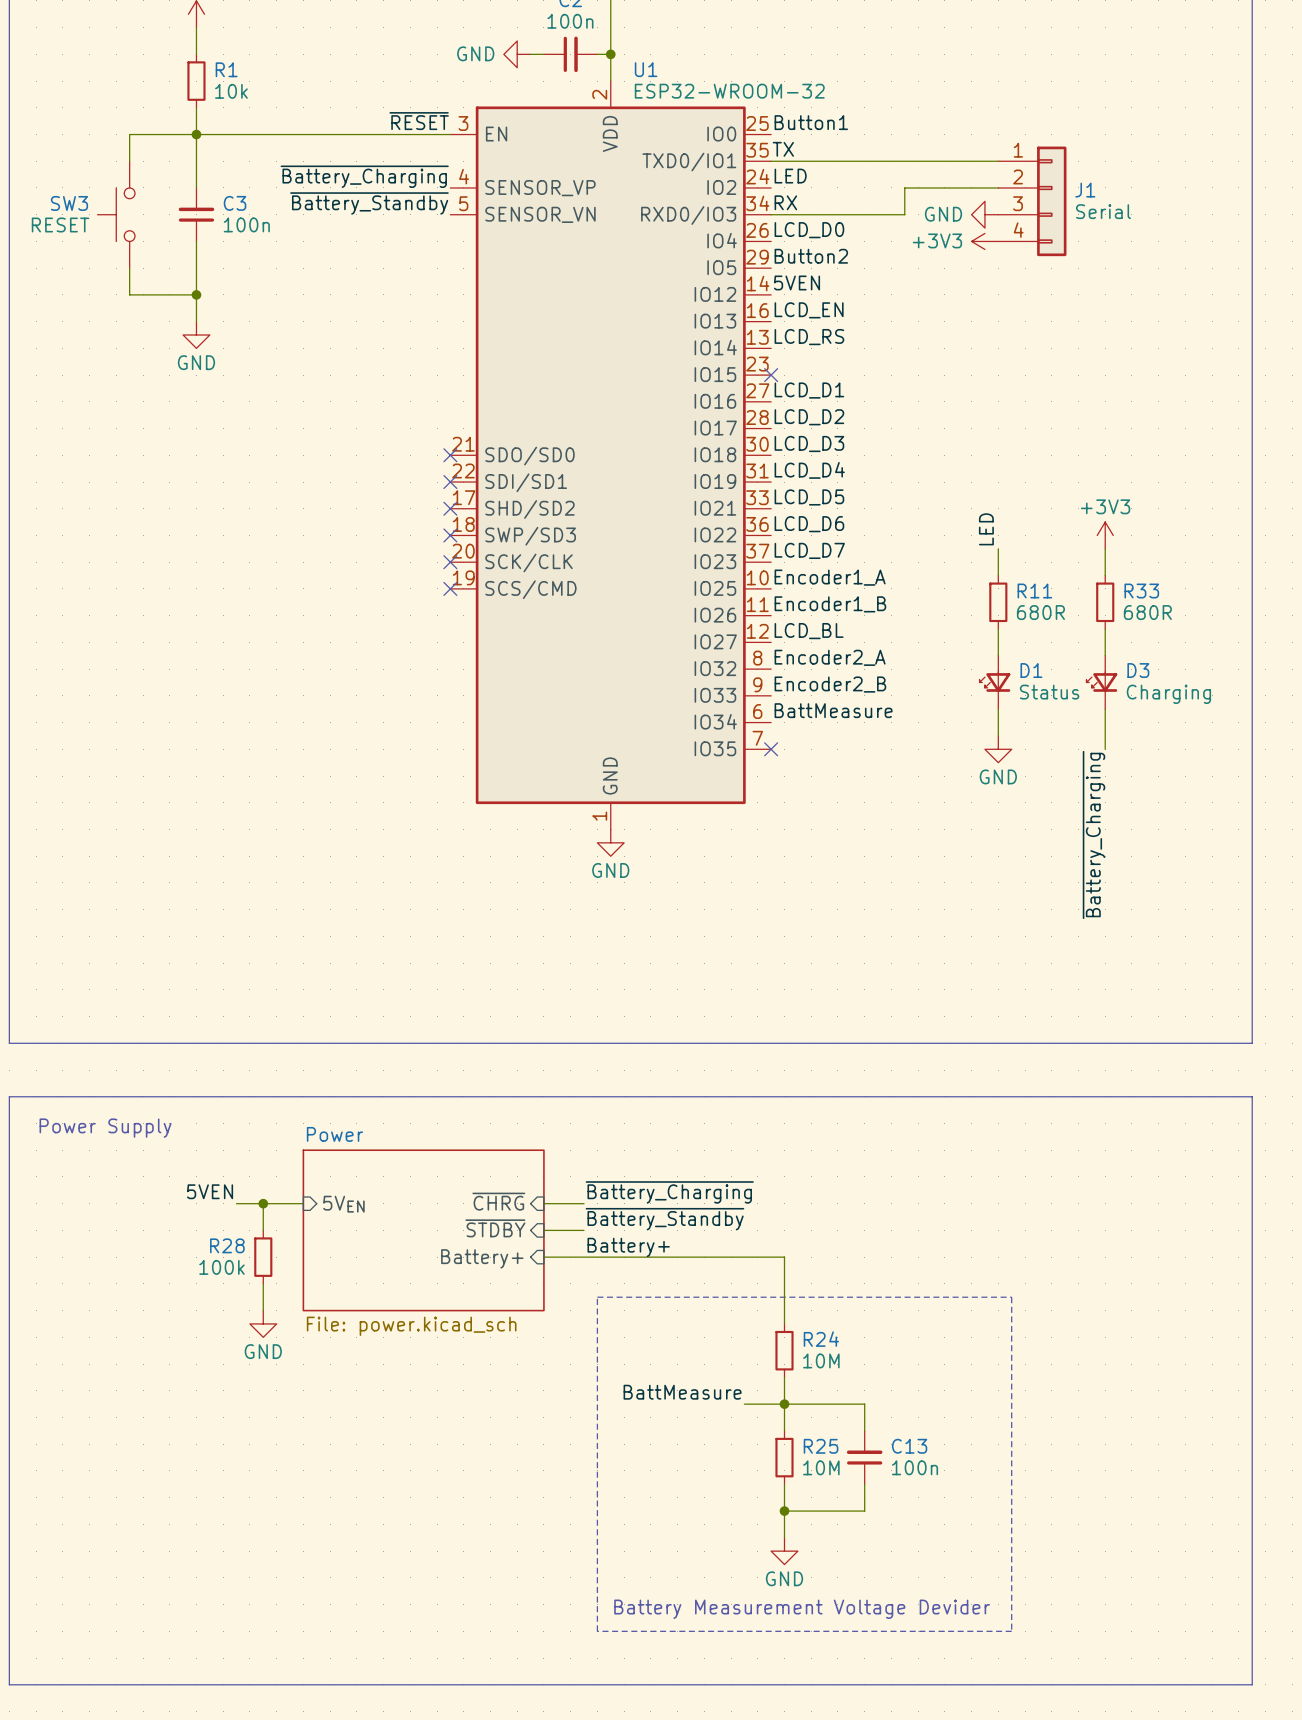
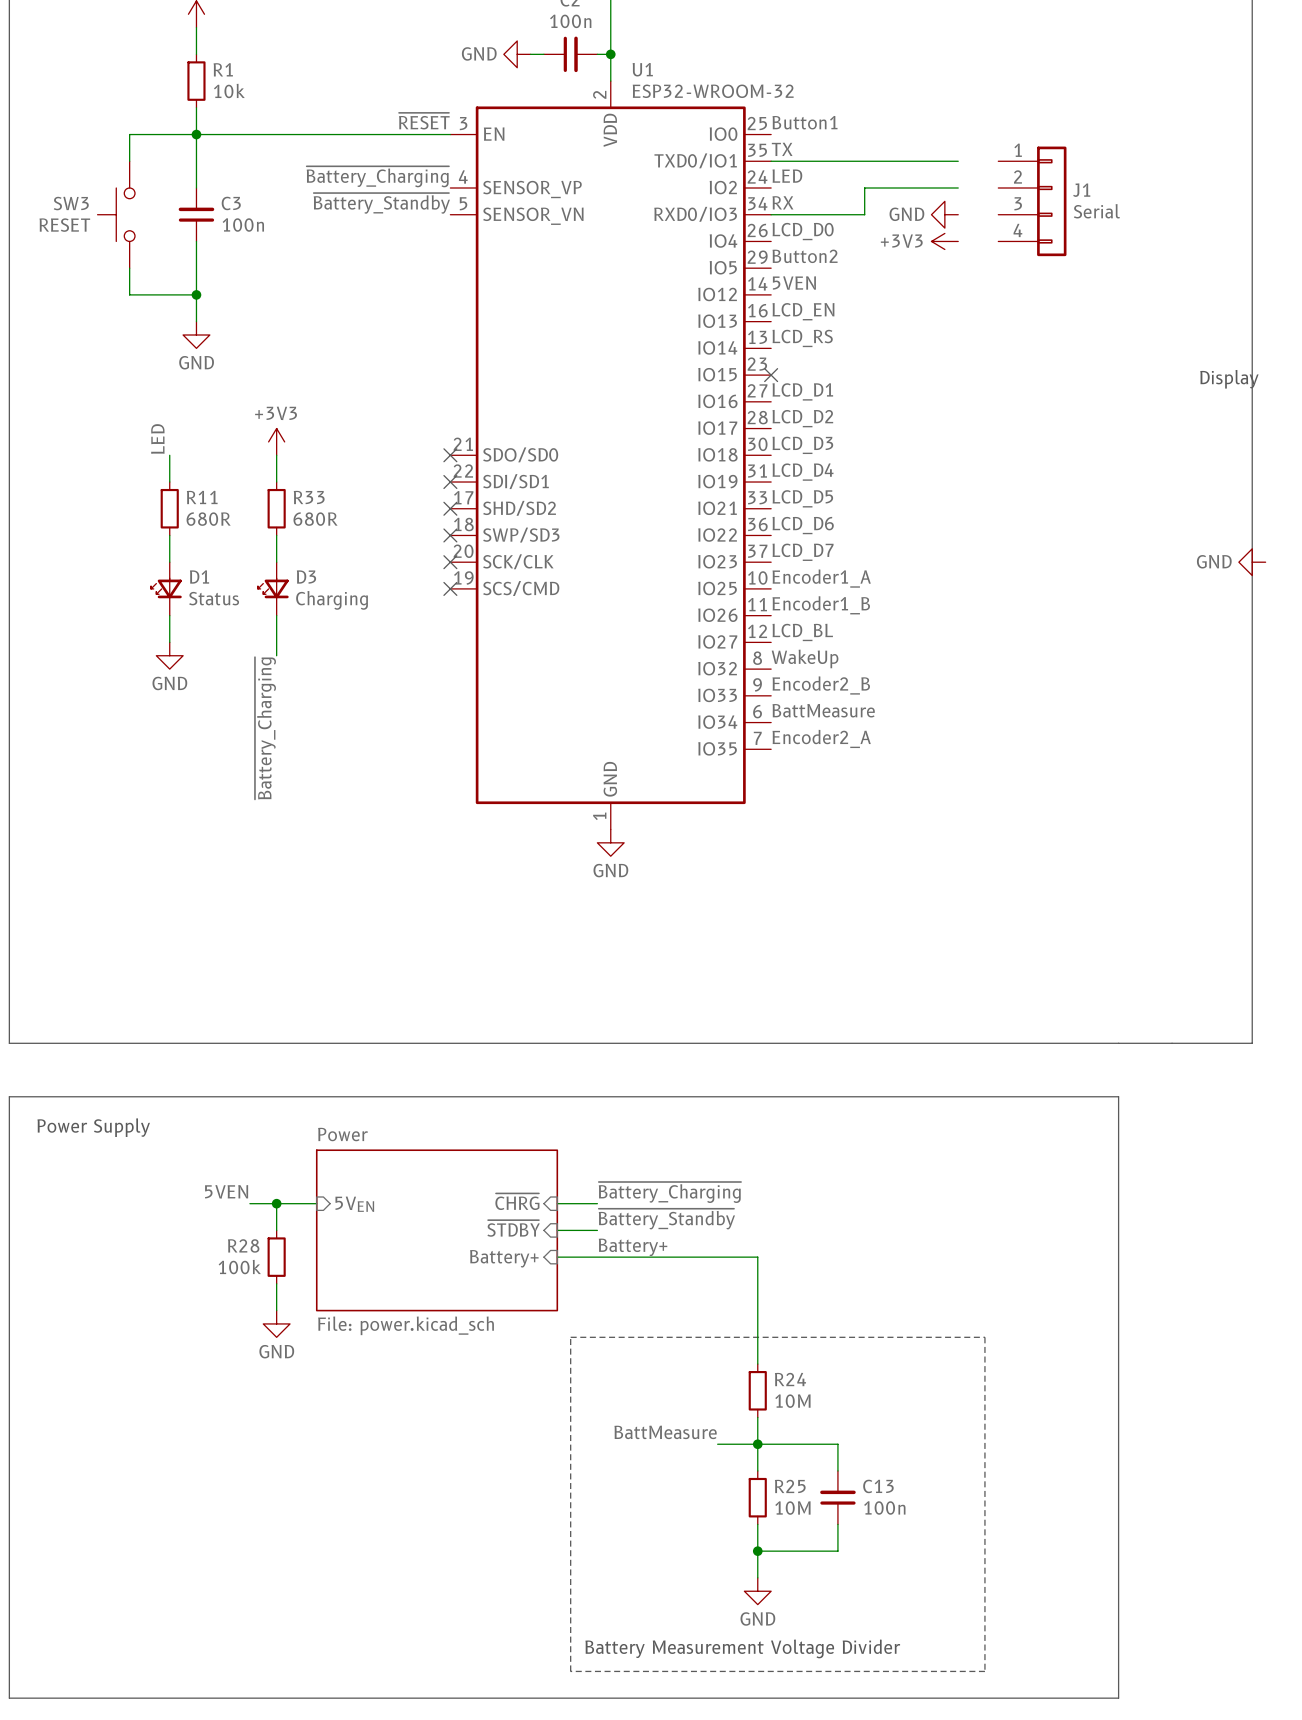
wire: (958, 161) (998, 161) -> none
wire: (904, 187) (904, 214) (864, 214) -> (904, 187) (864, 187) (864, 214)
wire: (958, 187) (998, 187) -> none
power symbol position: GND (984, 214) -> GND (944, 214)
power symbol position: +3V3 (984, 241) -> +3V3 (944, 241)
text: none -> Display (1229, 379)
label: none -> LED (157, 439)
power symbol: none -> +3V3 (276, 441)
wire: none -> (169, 455) (169, 482)
wire: none -> (276, 455) (276, 482)
label: LED (986, 529) -> none
wire: none -> (169, 535) (169, 562)
wire: none -> (276, 535) (276, 562)
power symbol: +3V3 (1105, 535) -> none
wire: (998, 548) (998, 575) -> none
wire: (1105, 548) (1105, 575) -> none
power symbol: none -> GND (1252, 562)
R11 position: (998, 602) -> (169, 508)
R33 position: (1105, 602) -> (276, 508)
wire: none -> (169, 615) (169, 642)
wire: none -> (276, 615) (276, 655)
wire: (998, 629) (998, 655) -> none
wire: (1105, 629) (1105, 655) -> none
power symbol: none -> GND (169, 655)
label: Encoder2_A (830, 657) -> WakeUp (805, 658)
D1 position: (994, 682) -> (166, 588)
D3 position: (1101, 682) -> (273, 588)
wire: (998, 709) (998, 735) -> none
wire: (1105, 709) (1105, 749) -> none
label: none -> Encoder2_A (821, 738)
label: none -> ~{Battery_Charging} (265, 728)
no-connect mark: (771, 749) -> none
power symbol: GND (998, 749) -> none
label: ~{Battery_Charging} (1094, 834) -> none
line: (1118, 1096) (1252, 1096) (1252, 1684) (9, 1684) -> (1118, 1096) (1118, 1698) (9, 1698) (9, 1684)
label position: 5VEN (210, 1191) -> 5VEN (226, 1191)
label position: ~{Battery_Charging} (669, 1192) -> ~{Battery_Charging} (669, 1192)
sheet pin position: ~{CHRG} (498, 1201) -> ~{CHRG} (517, 1201)
wire: (236, 1203) (249, 1203) -> (303, 1203) (316, 1203)
wire: (263, 1203) (263, 1230) -> (276, 1203) (276, 1230)
junction position: (263, 1203) -> (276, 1203)
wire: (543, 1203) (557, 1203) -> (584, 1203) (597, 1203)
sheet pin position: 5VEN (343, 1204) -> 5VEN (354, 1204)
label position: ~{Battery_Standby} (664, 1219) -> ~{Battery_Standby} (666, 1219)
sheet pin position: ~{STDBY} (495, 1228) -> ~{STDBY} (513, 1228)
sheet Power position: (423, 1230) -> (437, 1230)
wire: (543, 1230) (557, 1230) -> (584, 1230) (597, 1230)
label position: Battery+ (628, 1247) -> Battery+ (633, 1247)
R28 position: (263, 1257) -> (276, 1257)
wire: (543, 1257) (557, 1257) -> none
wire: (757, 1257) (784, 1257) (784, 1323) -> (757, 1257) (757, 1364)
sheet pin position: Battery+ (482, 1258) -> Battery+ (504, 1258)
wire: (263, 1283) (263, 1310) -> (276, 1283) (276, 1310)
line: (597, 1297) (1011, 1297) (1011, 1631) (597, 1631) (597, 1297) -> (570, 1337) (984, 1337) (984, 1671) (570, 1671) (570, 1337)
power symbol position: GND (263, 1323) -> GND (276, 1323)
R24 position: (784, 1350) -> (757, 1390)
wire: (784, 1377) (784, 1430) -> (757, 1417) (757, 1470)
label position: BattMeasure (682, 1392) -> BattMeasure (665, 1432)
wire: (744, 1404) (864, 1404) (864, 1430) -> (717, 1444) (837, 1444) (837, 1470)
junction: (784, 1404) -> none
junction: none -> (757, 1444)
R25 position: (784, 1457) -> (757, 1497)
C13 position: (864, 1457) -> (837, 1497)
wire: (784, 1484) (784, 1537) -> (757, 1524) (757, 1577)
wire: (864, 1484) (864, 1511) (784, 1511) -> (837, 1524) (837, 1551) (757, 1551)
junction: (784, 1511) -> none
junction: none -> (757, 1551)
power symbol position: GND (784, 1551) -> GND (757, 1591)
text: Battery Measurement Voltage Devider (802, 1609) -> none
text: none -> Battery Measurement Voltage Divider (742, 1648)

